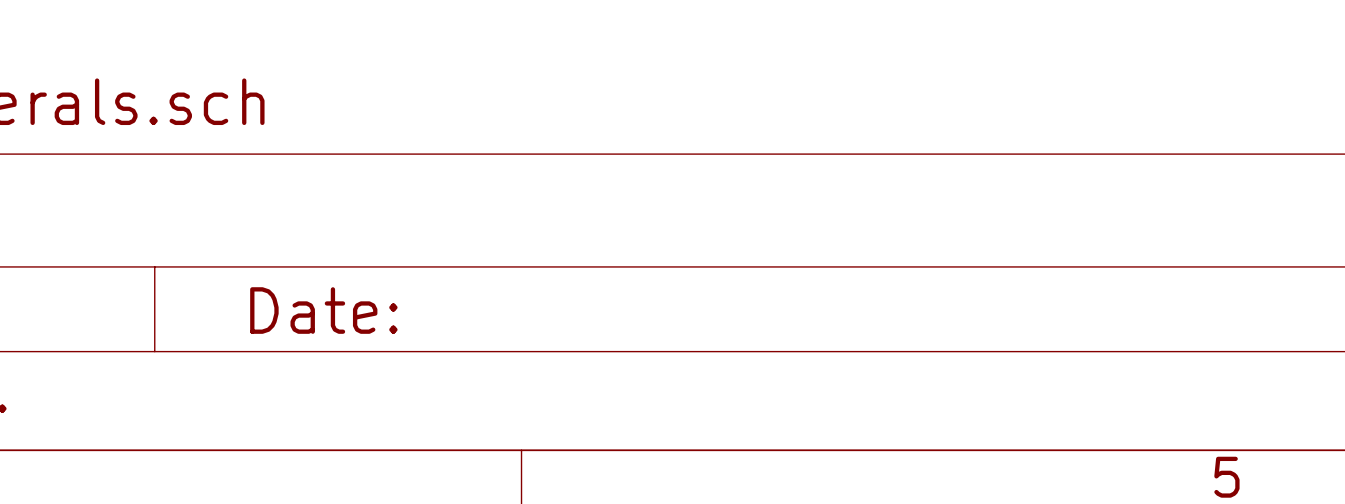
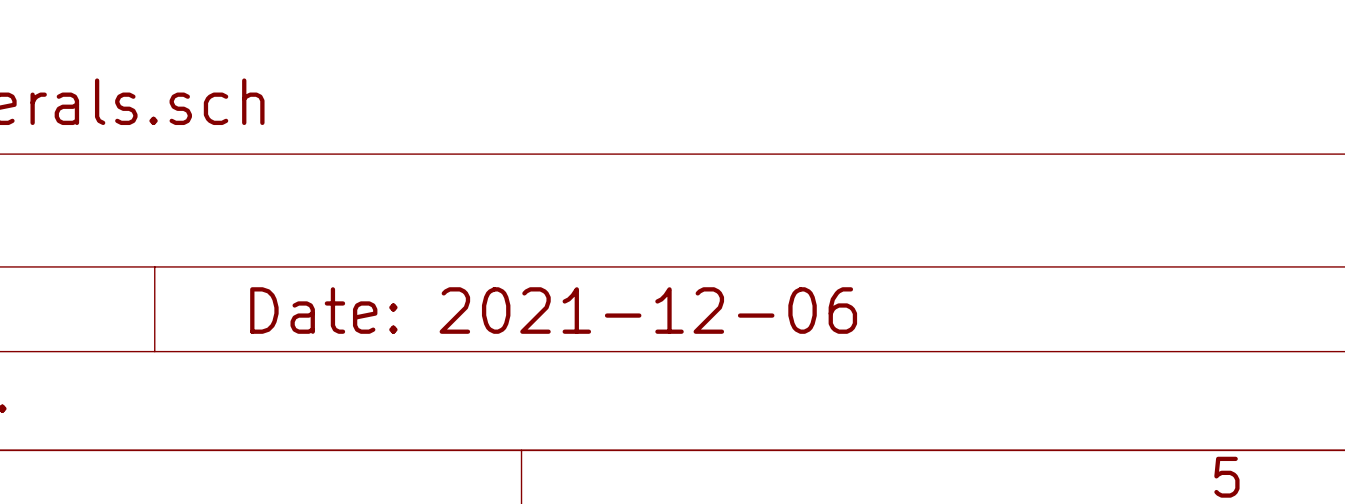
title block: Date: (323, 310) -> Date: 2021-12-06 (553, 310)

